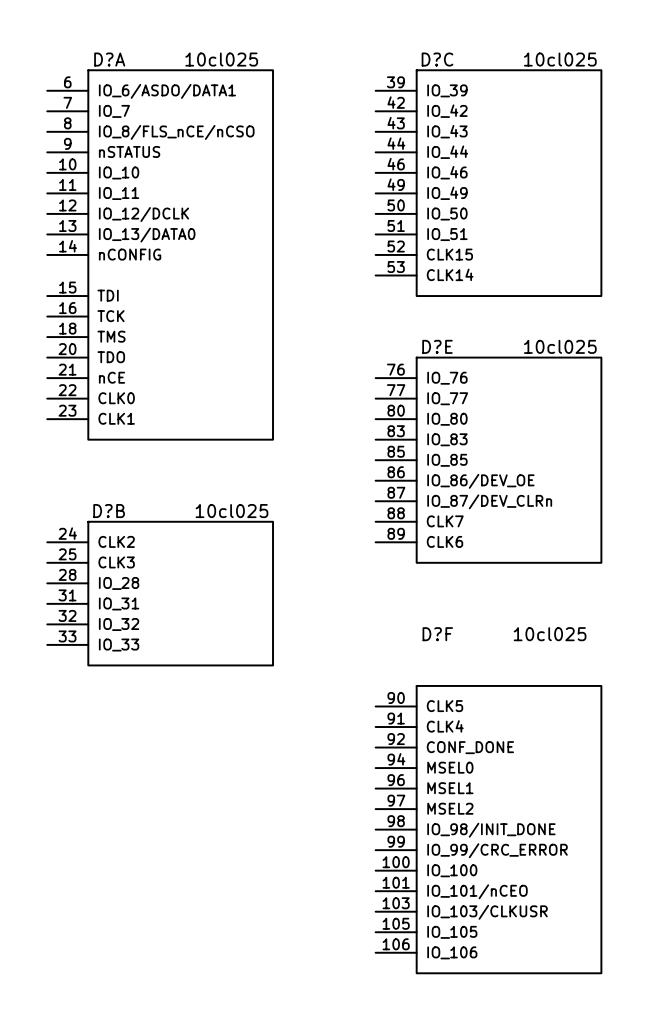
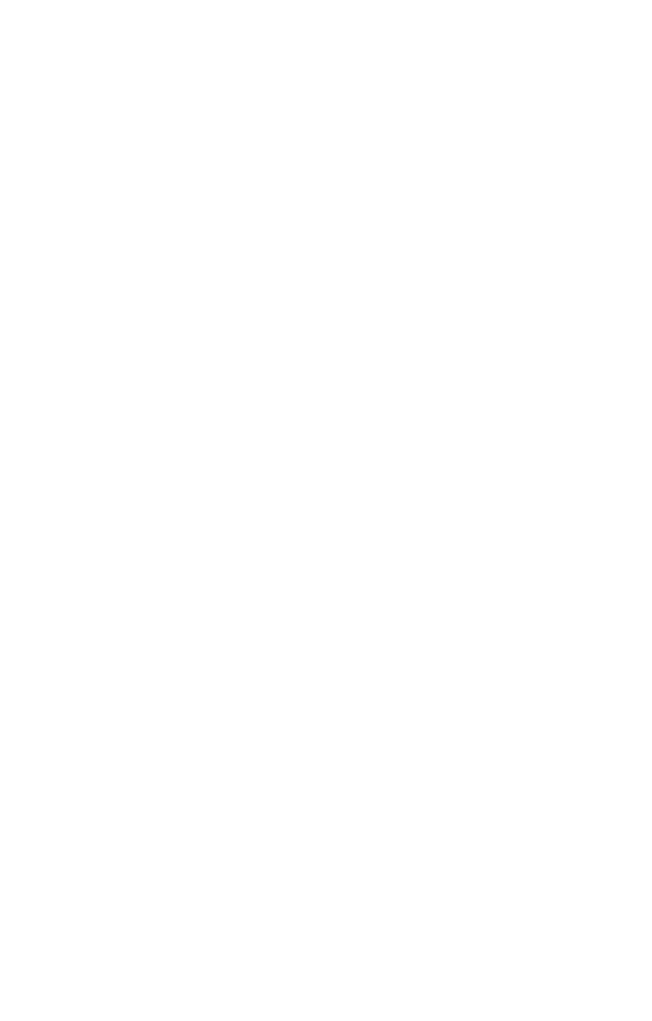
D?C: 10cl025 (488, 183) -> none
D?A: 10cl025 (160, 254) -> none
D?E: 10cl025 (488, 460) -> none
D?B: 10cl025 (160, 593) -> none
D?F: 10cl025 (488, 829) -> none

